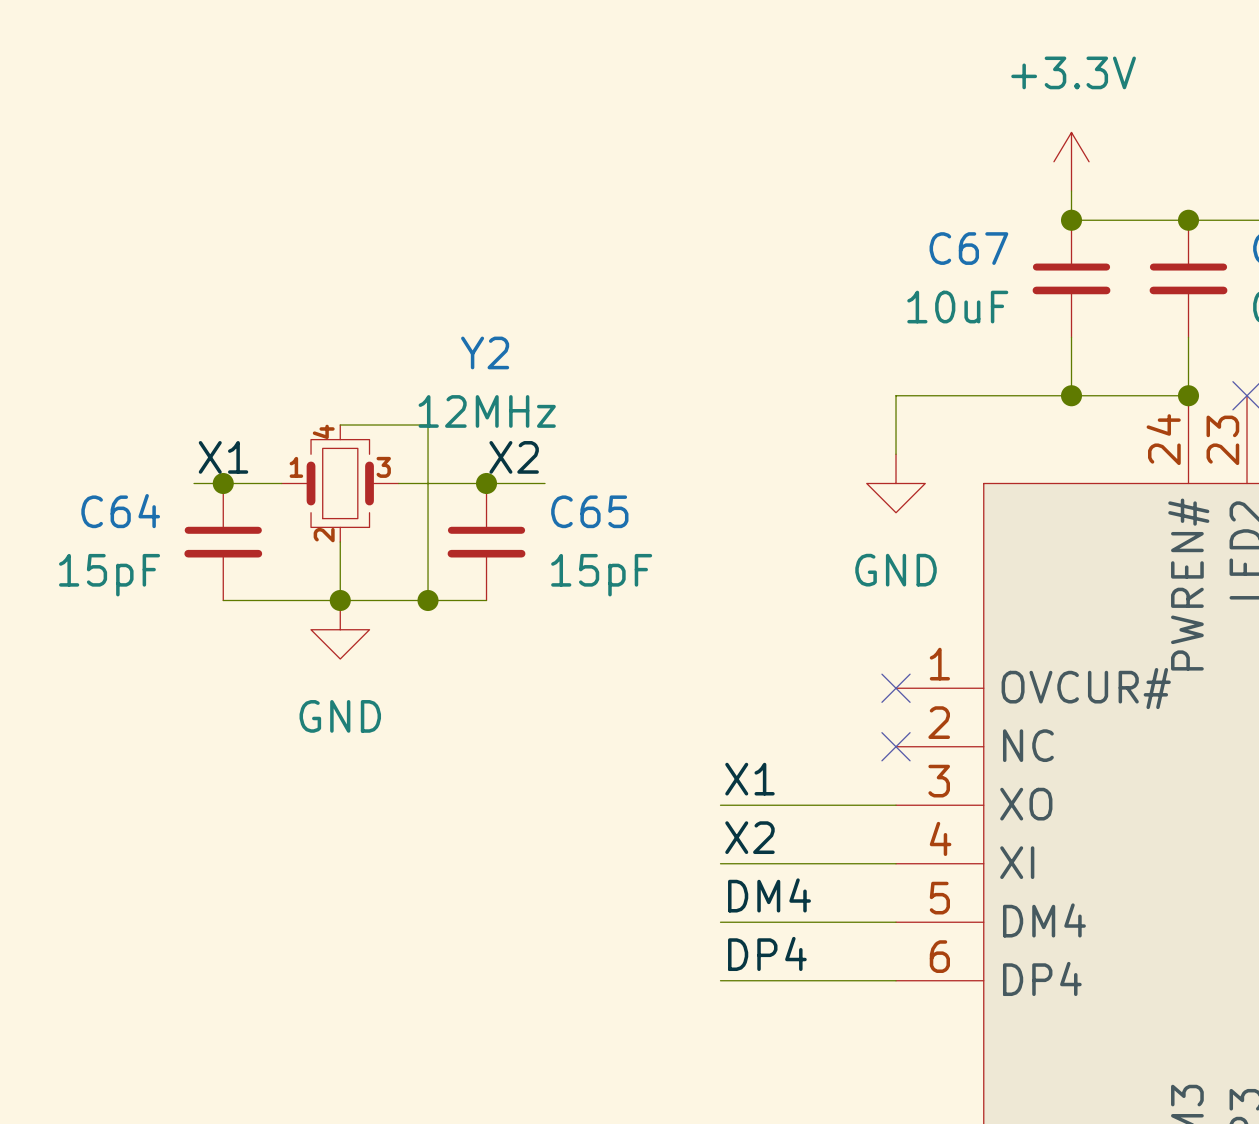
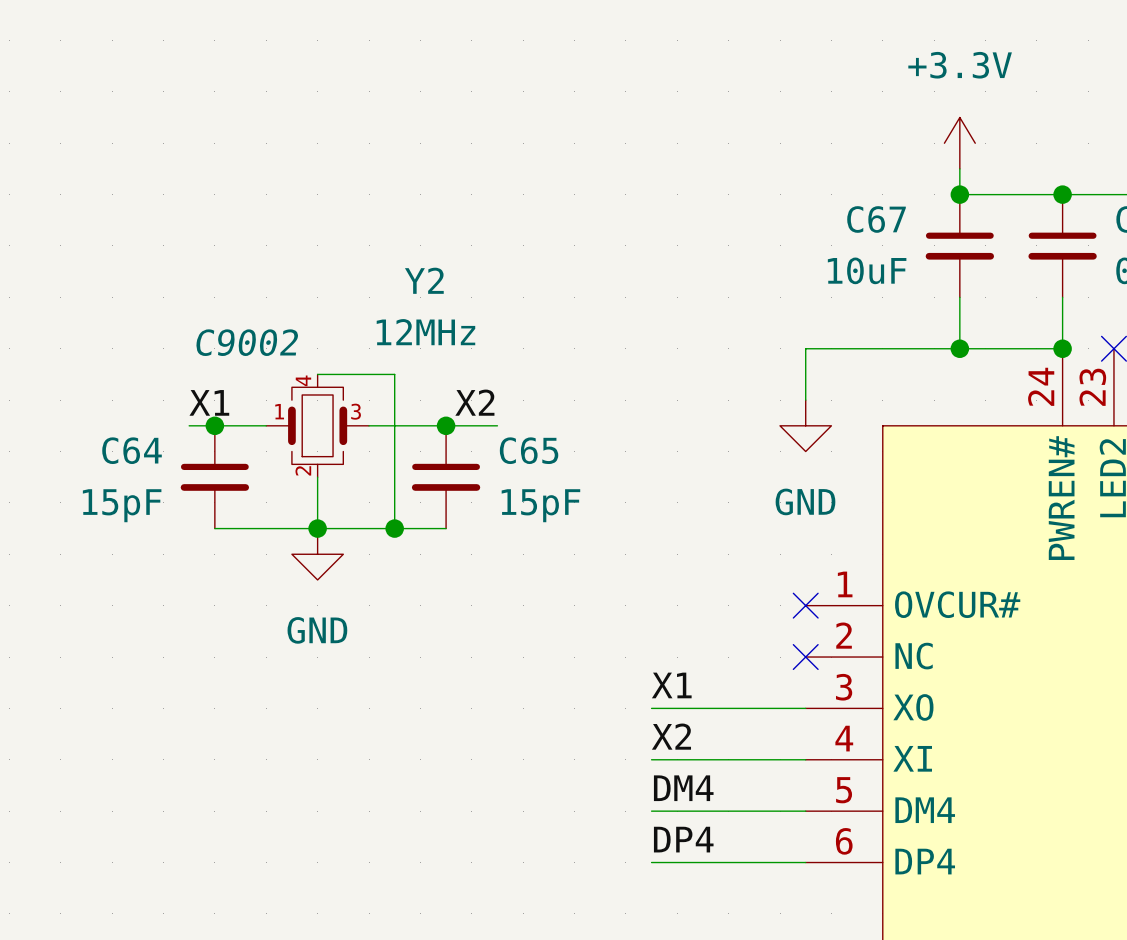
Y2 name position: Y2 (485, 352) -> Y2 (424, 280)
Y2 text: none -> C9002 (247, 342)
Y2 value position: 12MHz (487, 411) -> 12MHz (425, 332)

